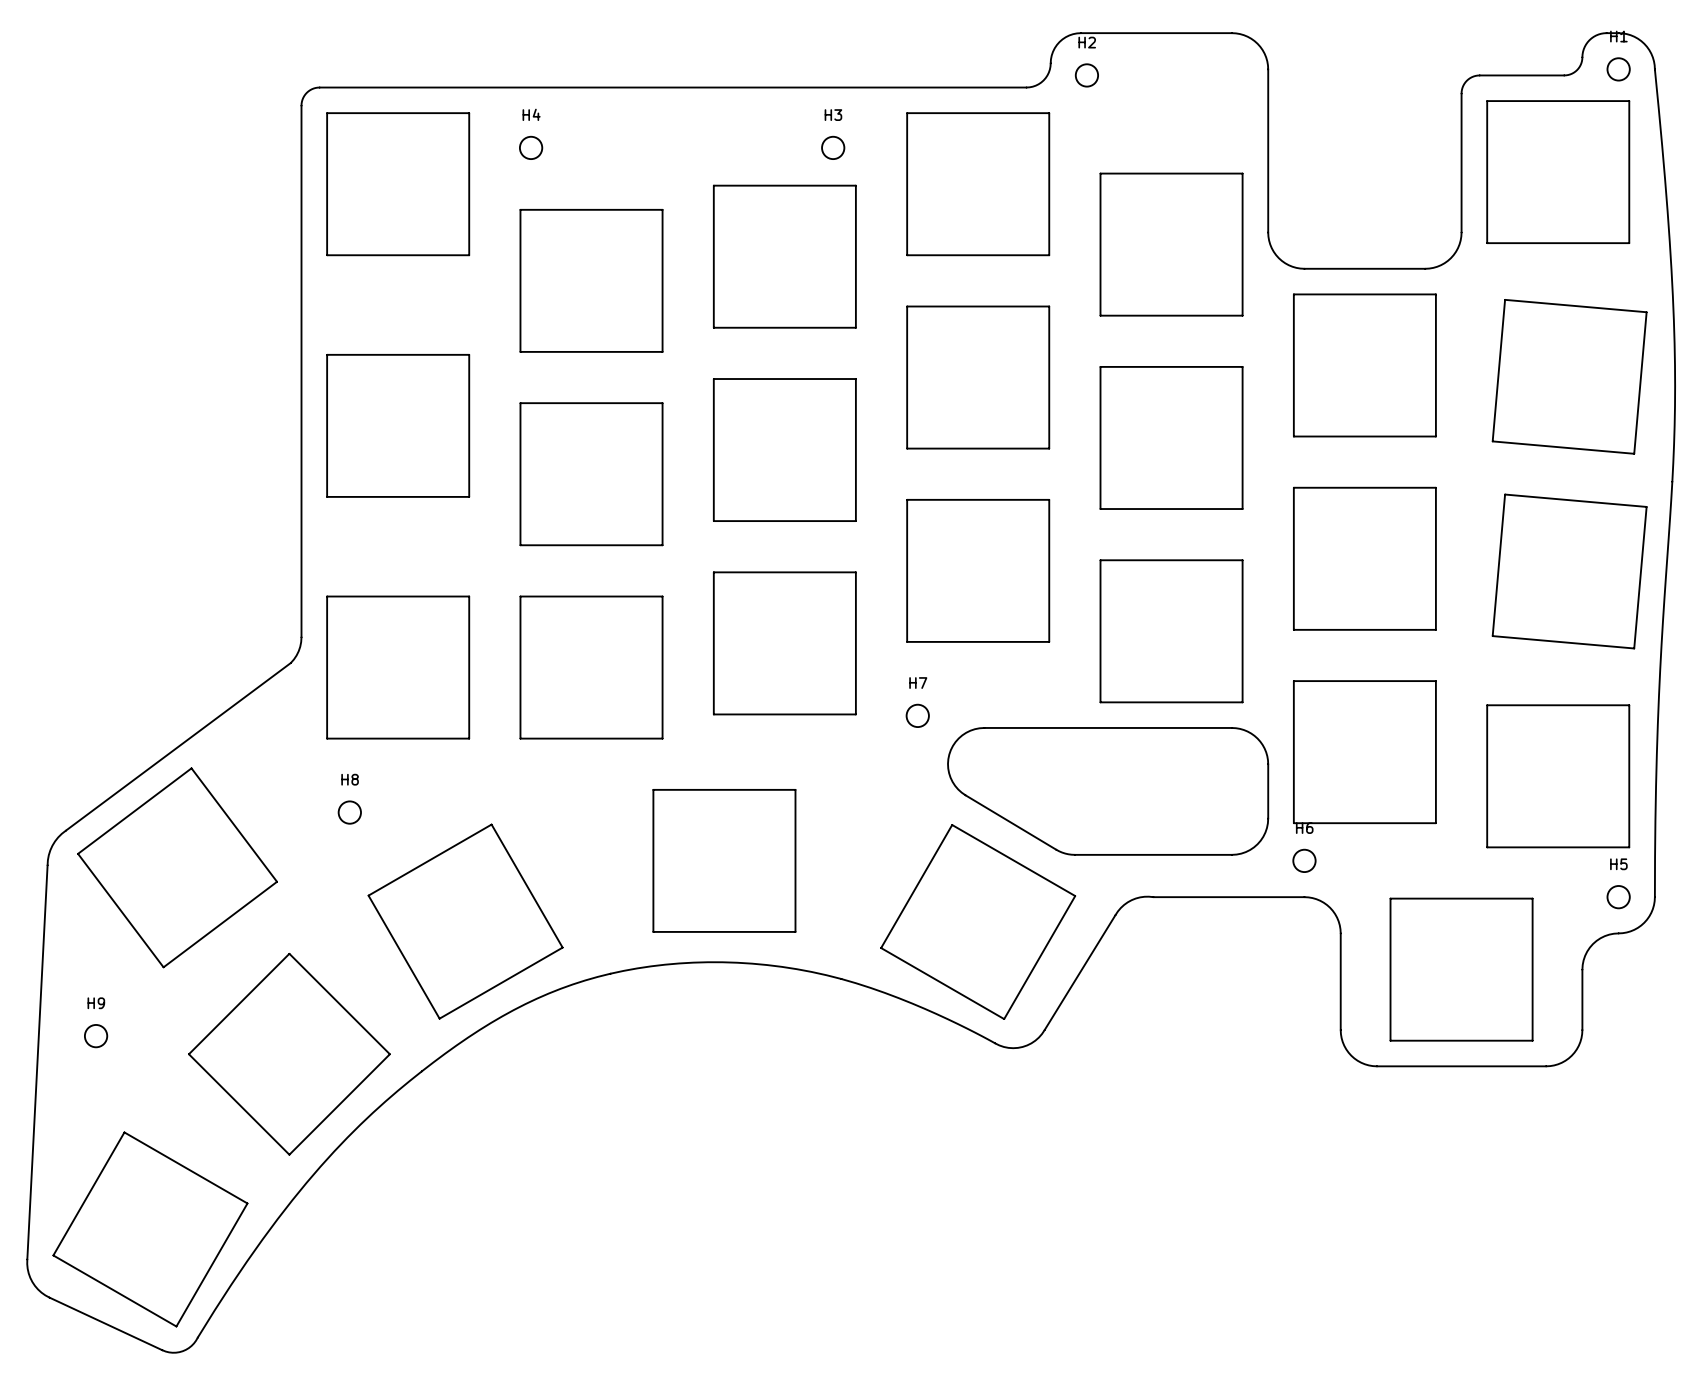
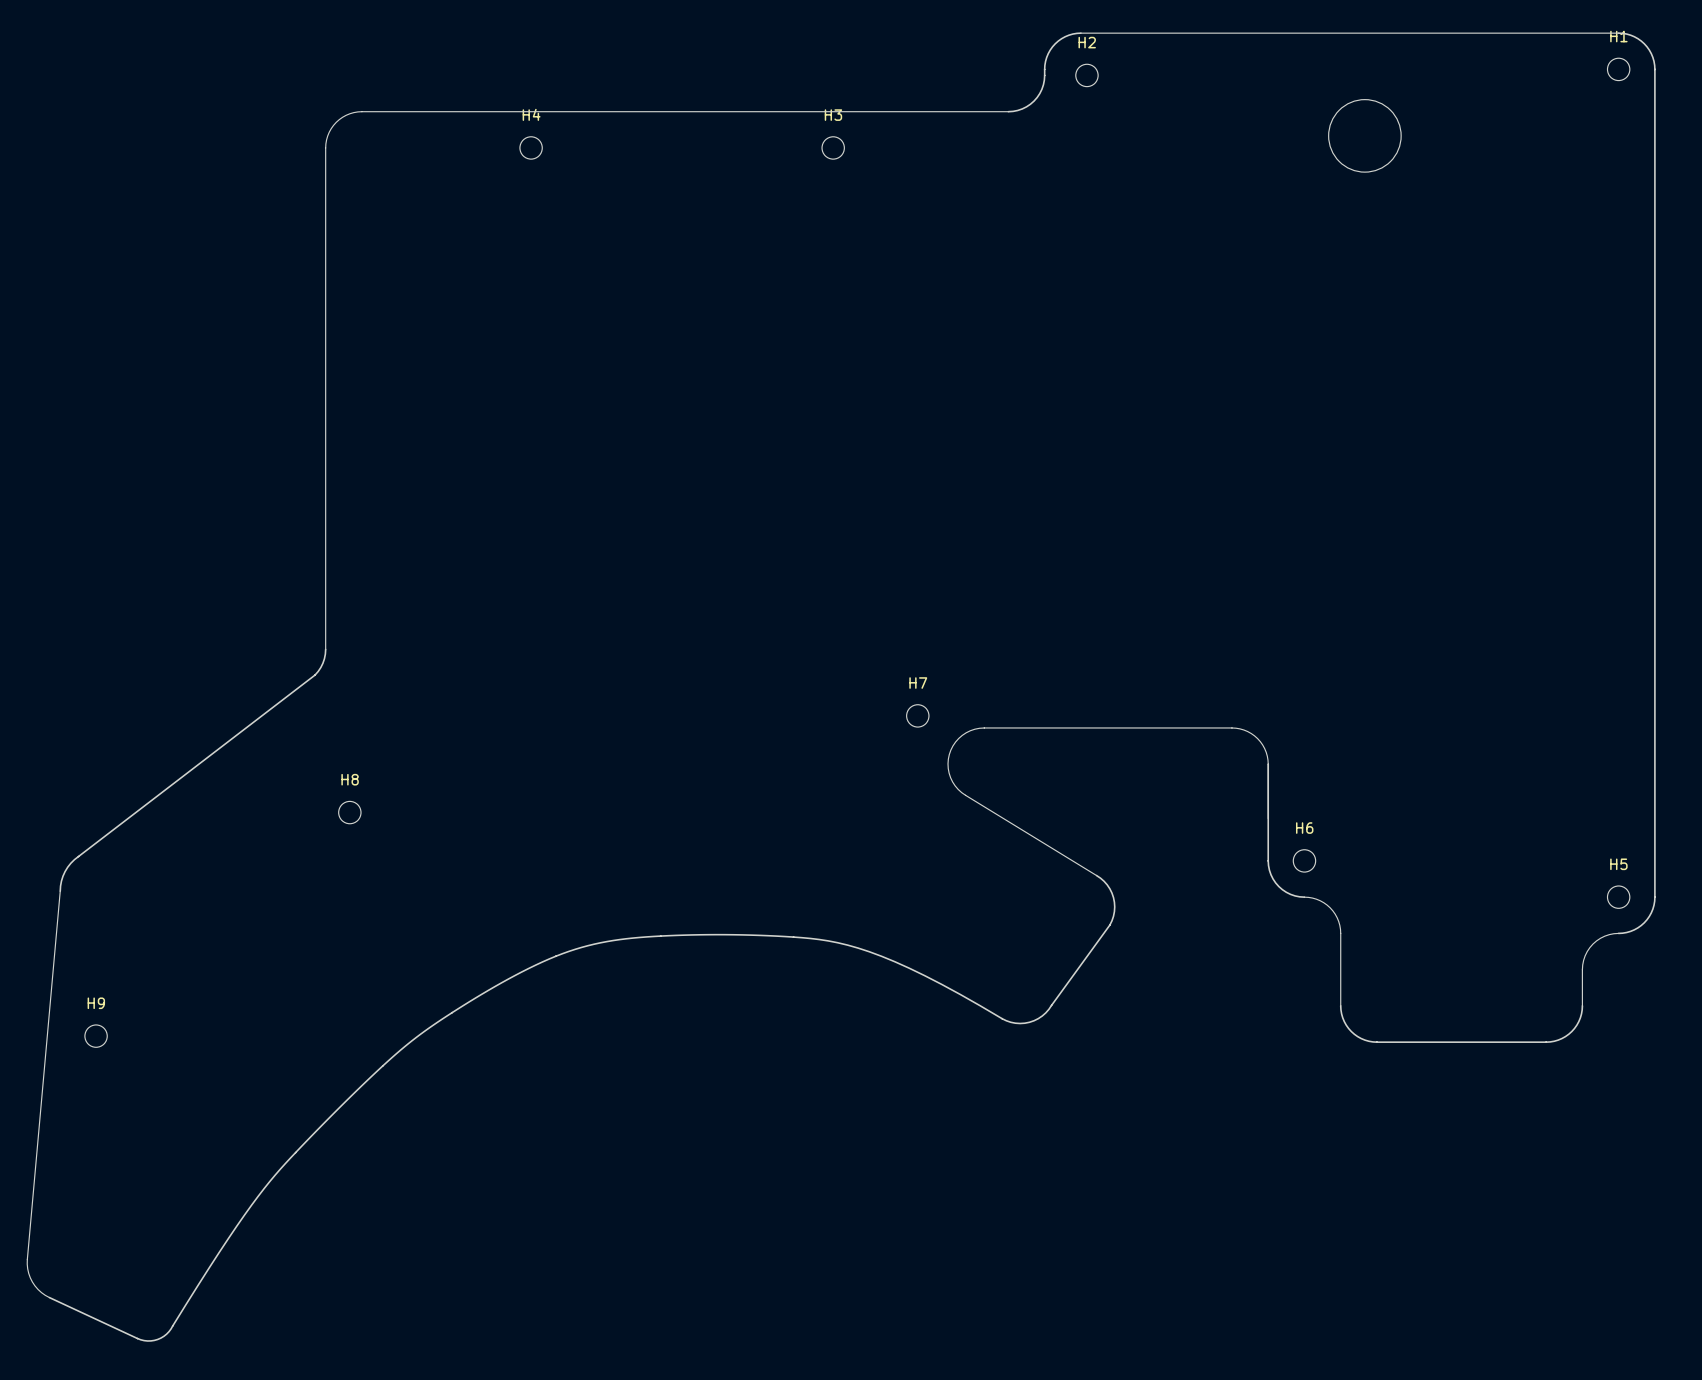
board edge: (1080, 33) (1069, 35) (1059, 42) (1053, 51) (1047, 75) (1041, 82) (1029, 87) (319, 87) (311, 89) (305, 94) (301, 105) (300, 646) (290, 662) (61, 833) (50, 850) (47, 865) (27, 1259) -> (1080, 33) (1065, 36) (1052, 46) (1045, 61) (1044, 80) (1039, 93) (1026, 106) (1013, 111) (361, 111) (346, 115) (333, 125) (327, 135) (325, 147) (324, 658) (315, 675) (74, 859) (65, 871) (60, 886) (27, 1259)
board edge: (1231, 33) (1243, 35) (1254, 41) (1266, 57) (1268, 69) (1268, 236) (1271, 248) (1278, 258) (1288, 265) (1300, 268) (1429, 268) (1441, 265) (1453, 255) (1459, 244) (1461, 232) (1461, 91) (1464, 83) (1470, 78) (1479, 75) (1570, 74) (1580, 65) (1583, 49) (1587, 42) (1596, 35) (1606, 33) (1626, 34) (1641, 41) (1651, 53) (1654, 69) -> none
board edge: (1654, 69) (1672, 295) (1675, 386) (1673, 463) (1658, 696) (1654, 901) (1651, 912) (1644, 922) (1634, 929) (1618, 933) -> (1231, 33) (1618, 33) (1637, 38) (1651, 53) (1654, 69) (1654, 897) (1652, 909) (1644, 922) (1634, 929) (1618, 933)
round board edge: none -> [1328, 99, 1402, 173]
drawing: [1486, 100, 1630, 244] -> none
drawing: [326, 112, 470, 256] -> none
drawing: [906, 112, 1050, 256] -> none
drawing: [1099, 172, 1244, 317] -> none
drawing: [713, 185, 857, 329] -> none
drawing: [519, 209, 664, 353] -> none
drawing: [1293, 293, 1437, 438] -> none
drawing: [1492, 299, 1648, 455] -> none
drawing: [906, 305, 1050, 450] -> none
drawing: [326, 354, 470, 498] -> none
drawing: [1099, 366, 1244, 510] -> none
drawing: [713, 378, 857, 522] -> none
drawing: [519, 402, 664, 546] -> none
drawing: [1293, 487, 1437, 631] -> none
drawing: [1492, 493, 1648, 650] -> none
drawing: [906, 499, 1050, 643] -> none
drawing: [1099, 559, 1244, 703] -> none
drawing: [713, 571, 857, 716] -> none
drawing: [326, 595, 470, 740] -> none
drawing: [519, 595, 664, 740] -> none
drawing: [1293, 680, 1437, 824] -> none
drawing: [1486, 704, 1630, 848] -> none
board edge: none -> (1268, 764) (1269, 870) (1273, 879) (1282, 889) (1295, 895) (1304, 897)
drawing: [52, 767, 564, 1328] -> none
drawing: [652, 789, 797, 933] -> none
board edge: (965, 795) (1056, 849) (1071, 854) (1236, 854) (1250, 850) (1260, 840) (1266, 827) (1268, 818) -> none
drawing: [880, 824, 1076, 1020] -> none
board edge: (1304, 897) (1144, 896) (1131, 900) (1118, 911) (1042, 1034) (1031, 1043) (1018, 1047) (999, 1045) (936, 1014) (884, 992) (841, 979) (796, 969) (752, 963) (693, 962) (637, 968) (585, 980) (536, 998) (479, 1030) (421, 1071) (373, 1112) (334, 1151) (292, 1200) (247, 1261) (196, 1340) (185, 1349) (176, 1352) (165, 1351) (49, 1297) -> (965, 795) (1100, 878) (1109, 888) (1113, 897) (1114, 911) (1109, 925) (1048, 1009) (1038, 1018) (1020, 1023) (1006, 1020) (941, 984) (894, 961) (858, 948) (828, 940) (767, 935) (683, 935) (626, 938) (581, 947) (535, 965) (475, 998) (420, 1034) (377, 1070) (317, 1129) (269, 1181) (236, 1226) (171, 1328) (163, 1336) (150, 1340) (140, 1339) (49, 1297)
drawing: [1389, 898, 1534, 1042] -> none
board edge: (1340, 1005) (1340, 1034) (1344, 1045) (1351, 1055) (1365, 1064) (1376, 1066) (1546, 1066) (1561, 1062) (1576, 1049) (1582, 1034) (1582, 1005) -> (1340, 1005) (1342, 1017) (1348, 1028) (1357, 1036) (1368, 1041) (1546, 1042) (1561, 1038) (1571, 1031) (1578, 1021) (1582, 1005)

